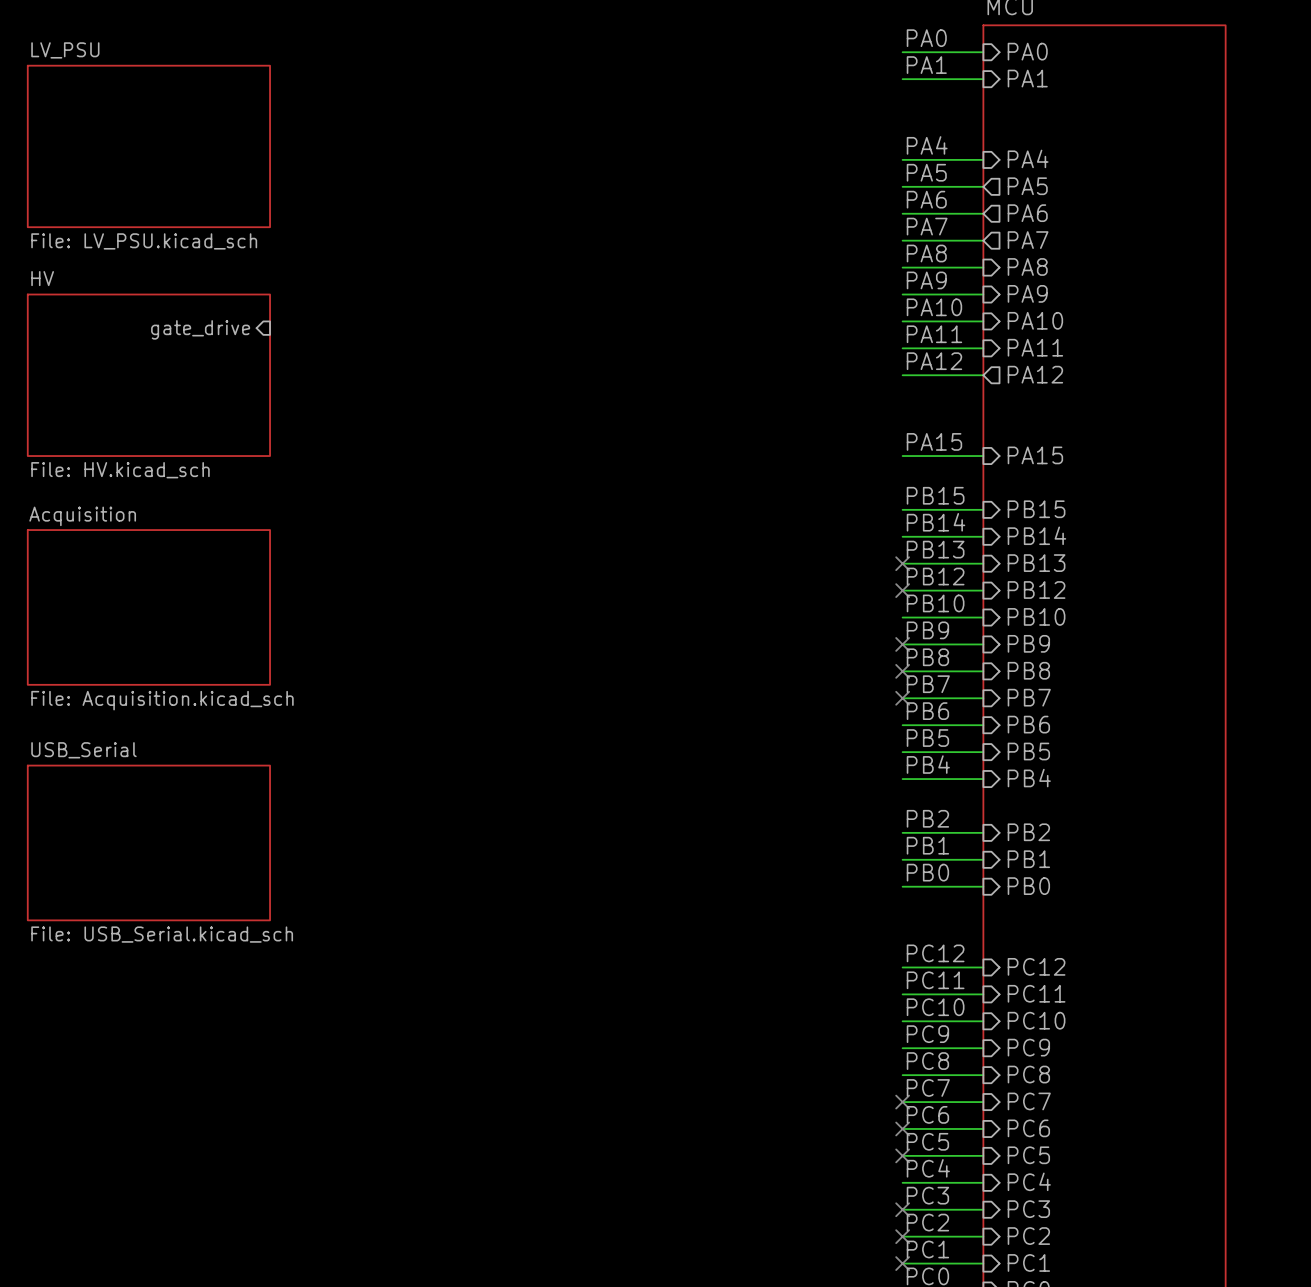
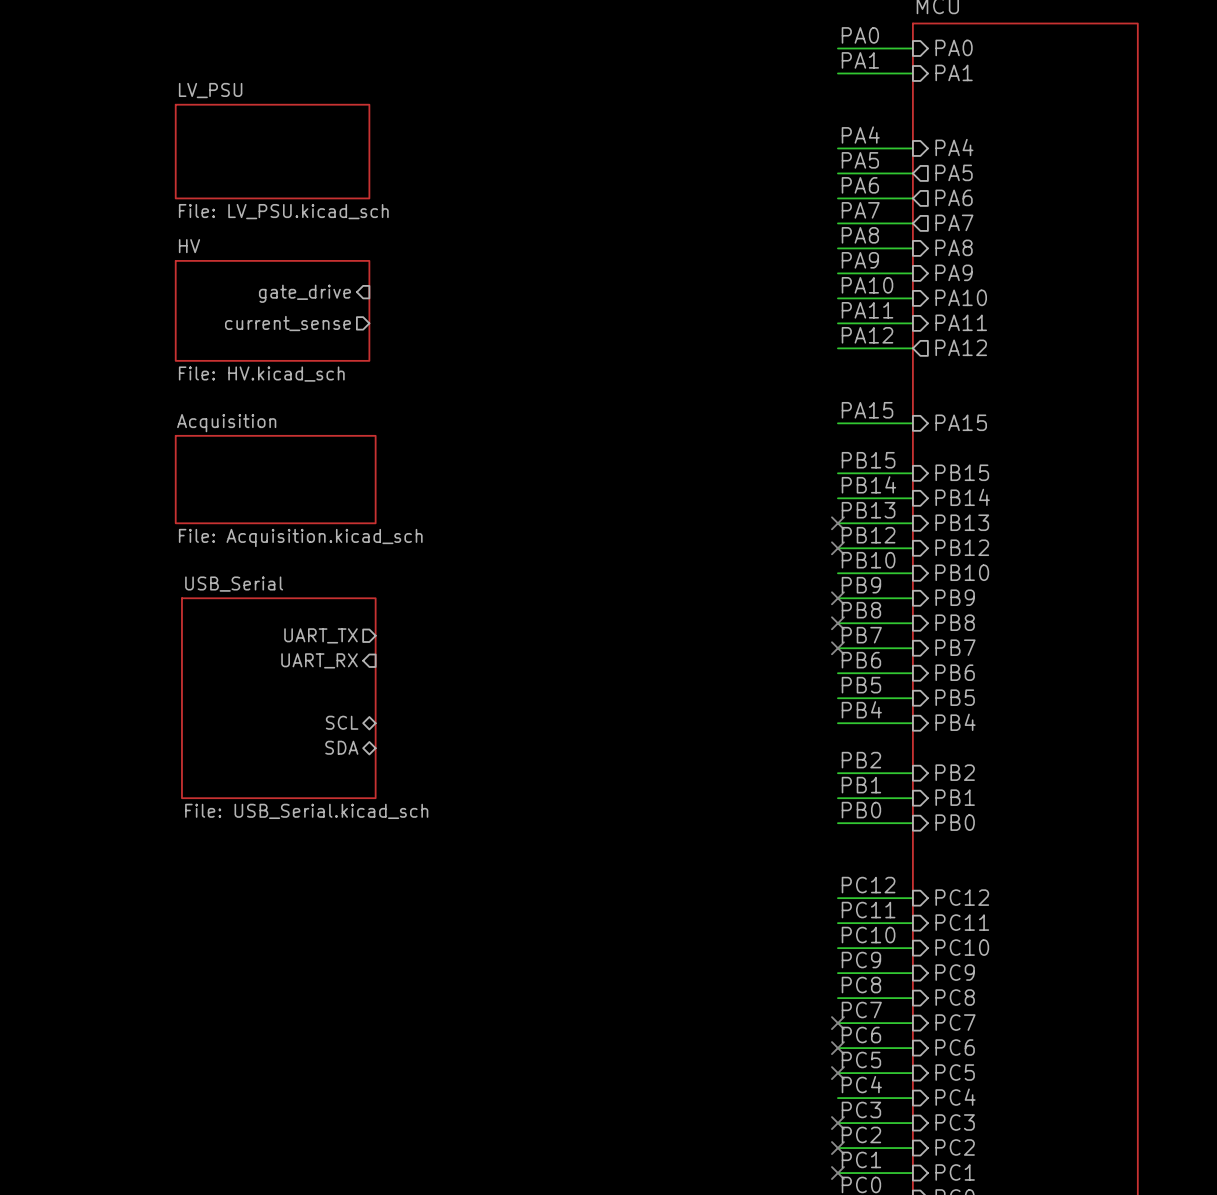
sheet LV_PSU: File: LV_PSU.kicad_sch (148, 146) -> none
sheet LV_PSU: none -> File: LV_PSU.kicad_sch (272, 151)
sheet pin position: gate_drive (200, 329) -> gate_drive (304, 293)
sheet HV: none -> File: HV.kicad_sch (272, 310)
sheet pin: none -> current_sense (287, 323)
sheet HV: File: HV.kicad_sch (148, 375) -> none
sheet Acquisition: none -> File: Acquisition.kicad_sch (275, 479)
sheet Acquisition: File: Acquisition.kicad_sch (148, 607) -> none
sheet pin: none -> UART_TX (321, 635)
sheet pin: none -> UART_RX (319, 660)
sheet USB_Serial: none -> File: USB_Serial.kicad_sch (278, 698)
sheet pin: none -> SCL (342, 722)
sheet pin: none -> SDA (341, 747)
sheet USB_Serial: File: USB_Serial.kicad_sch (148, 842) -> none

